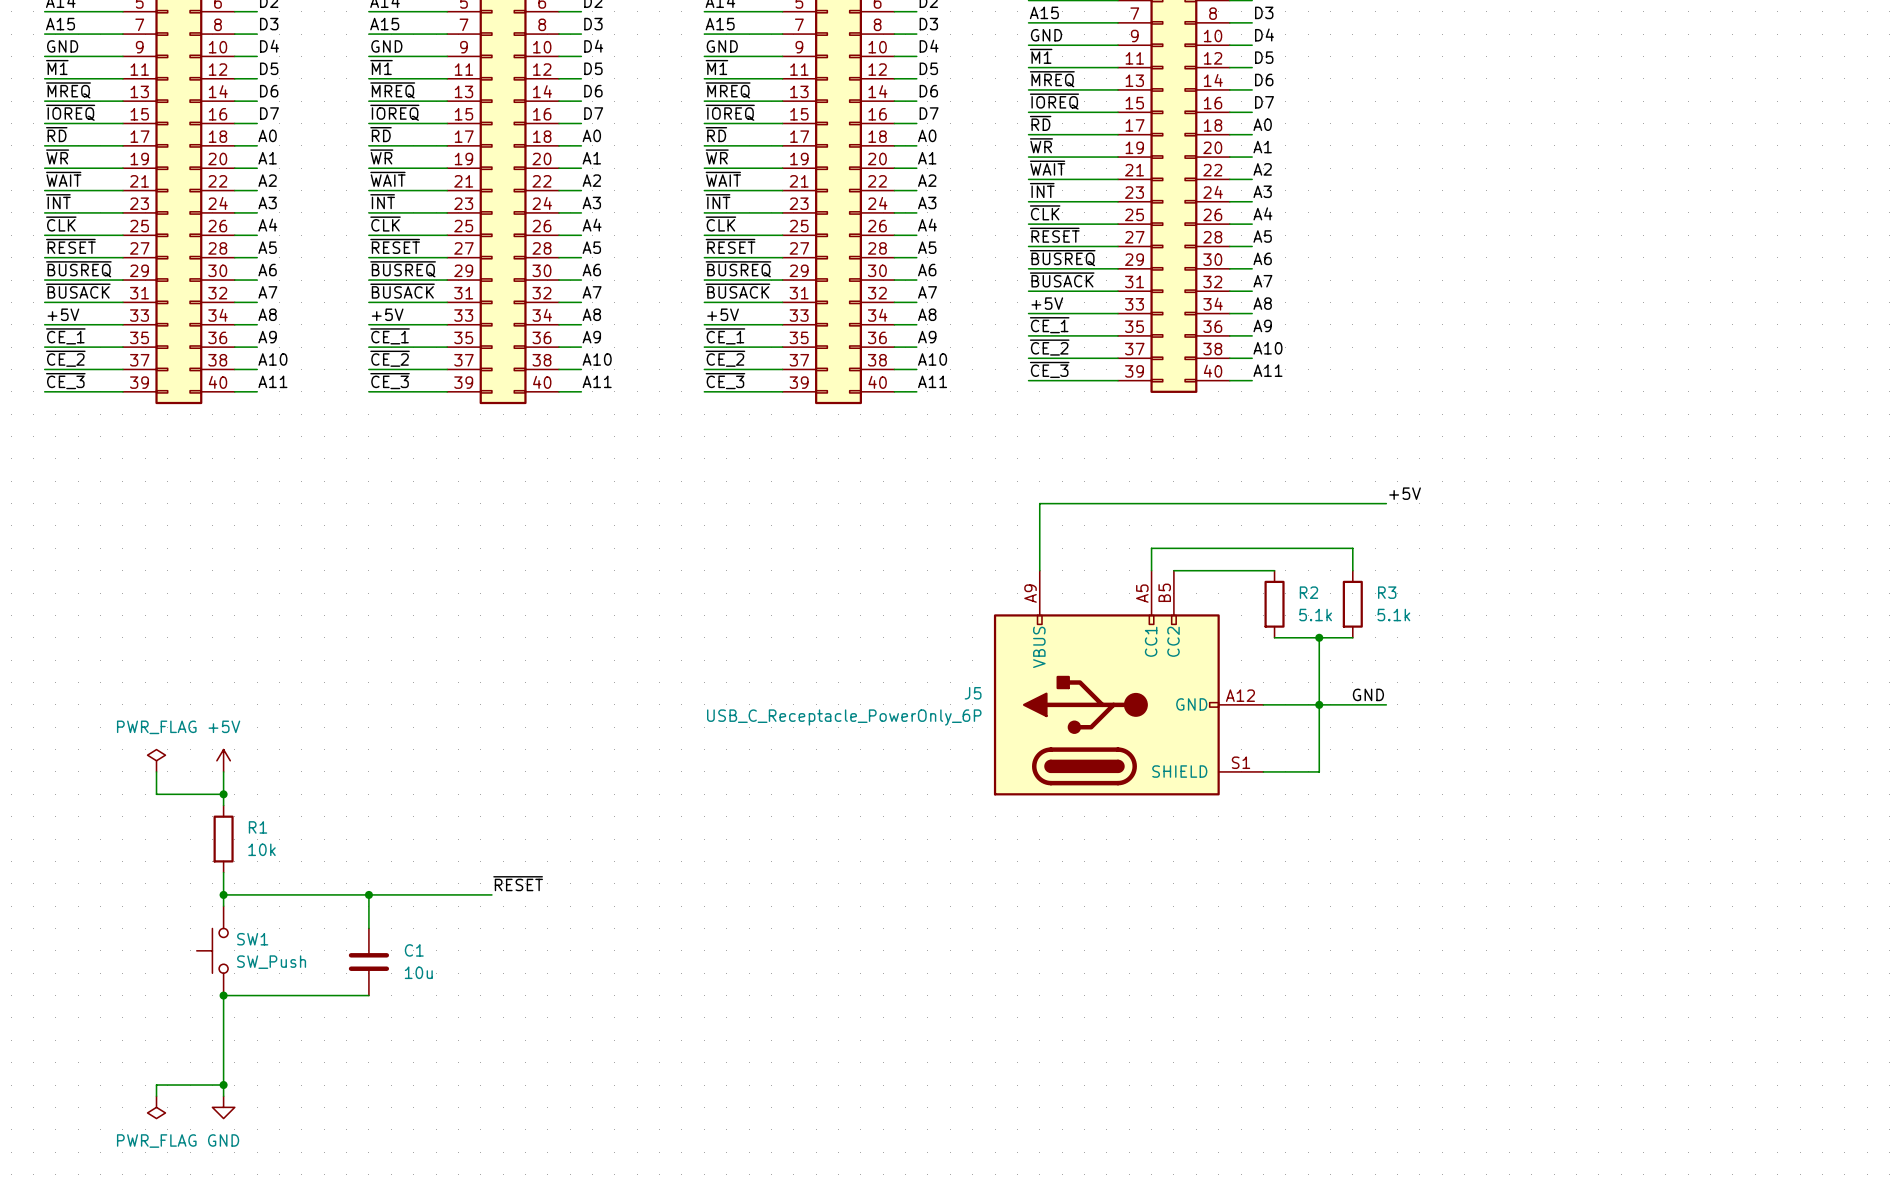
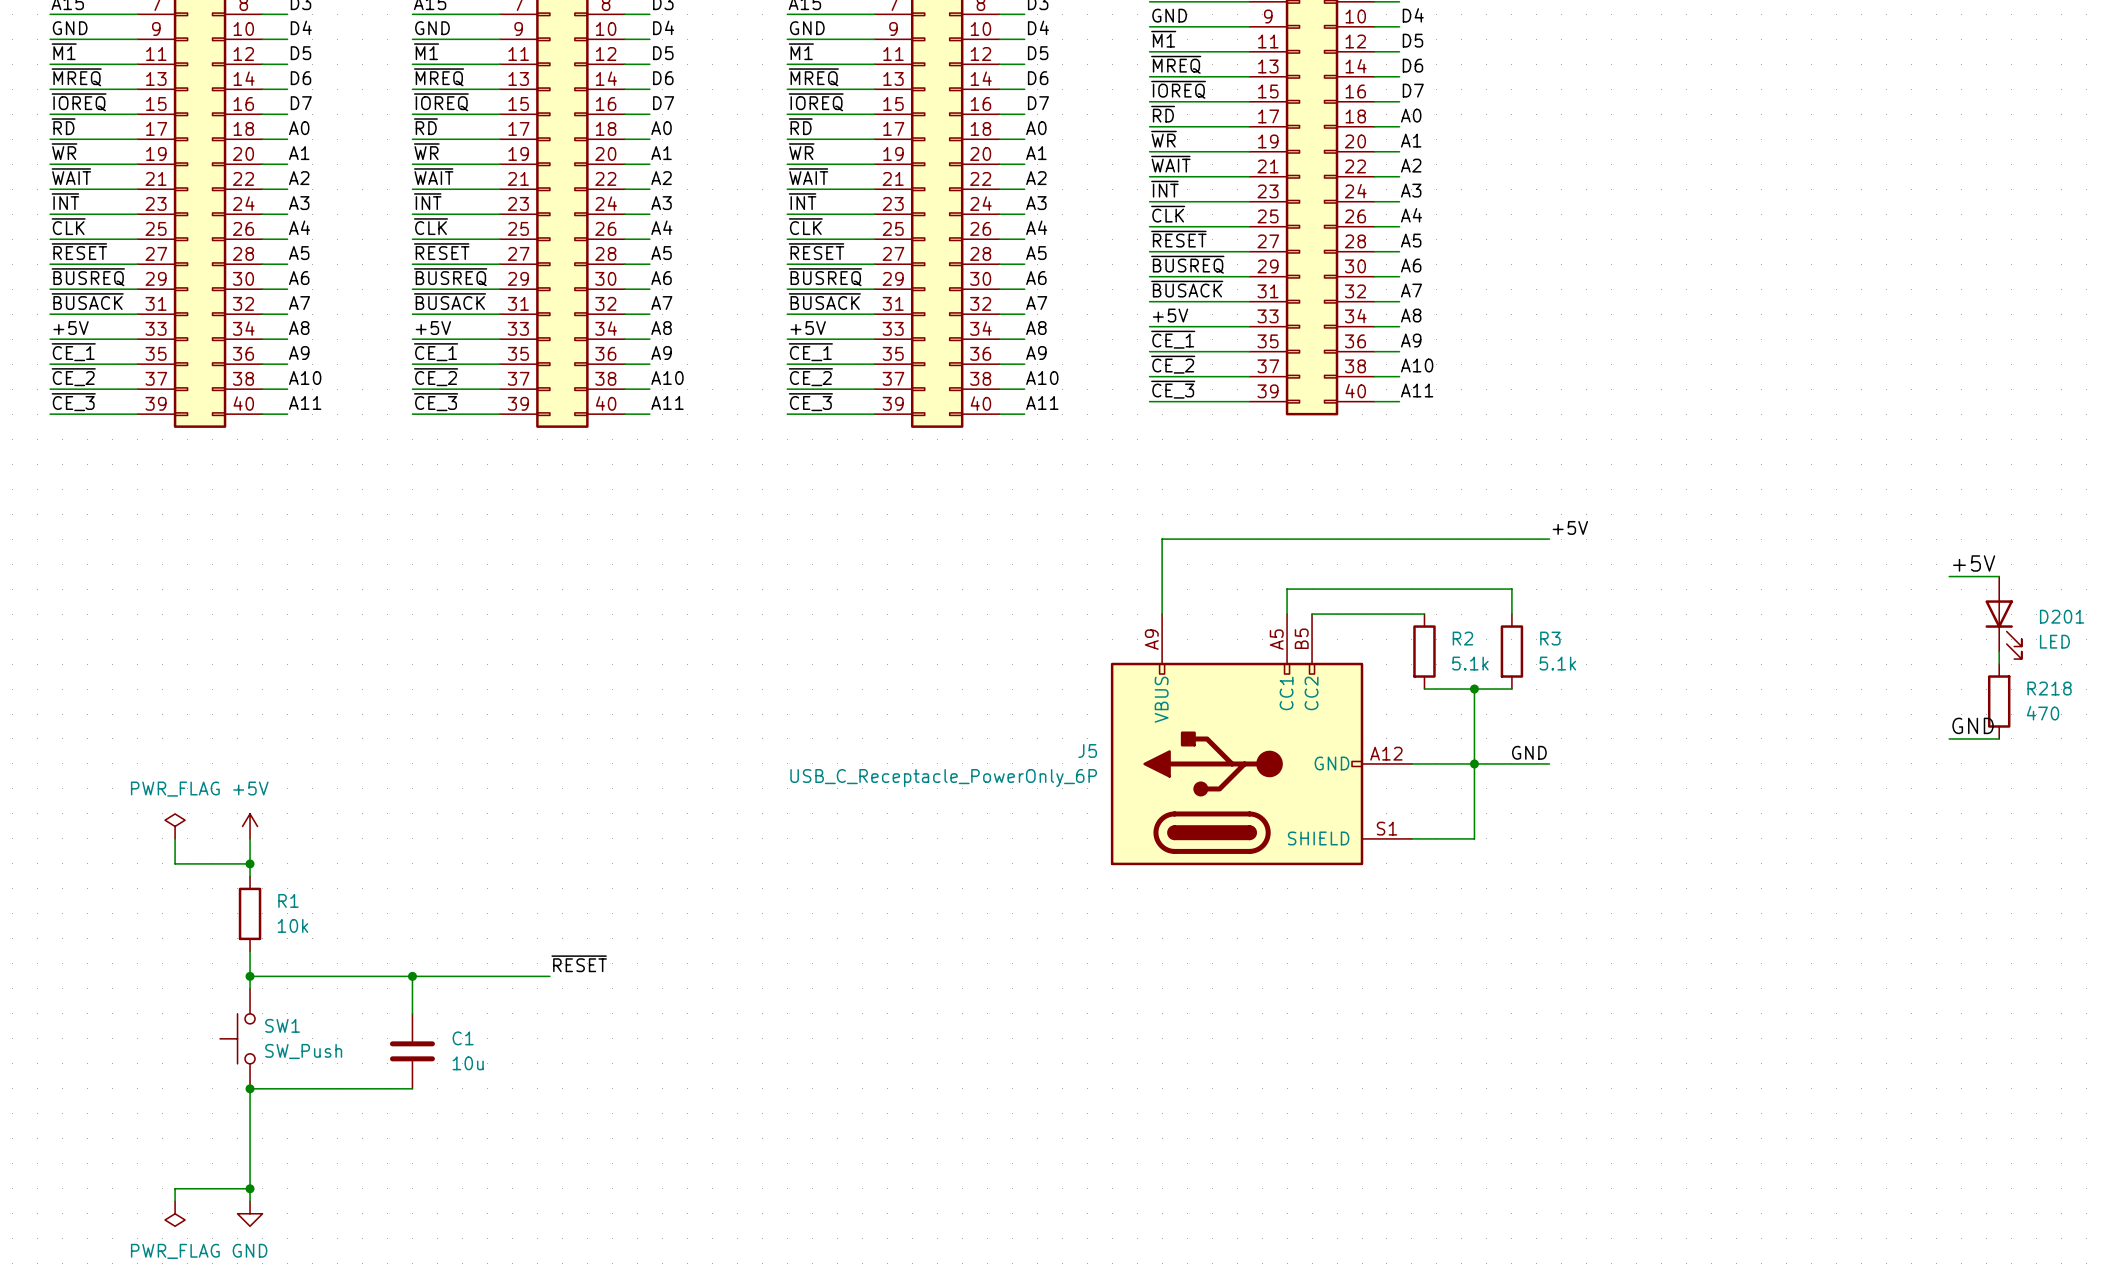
label: none -> +5V (1974, 563)
wire: none -> (1949, 576) (1999, 576)
D201: none -> LED (2003, 617)
wire: none -> (1999, 651) (1999, 664)
R218: none -> 470 (1999, 701)
label: none -> GND (1973, 725)
wire: none -> (1949, 738) (1999, 738)

